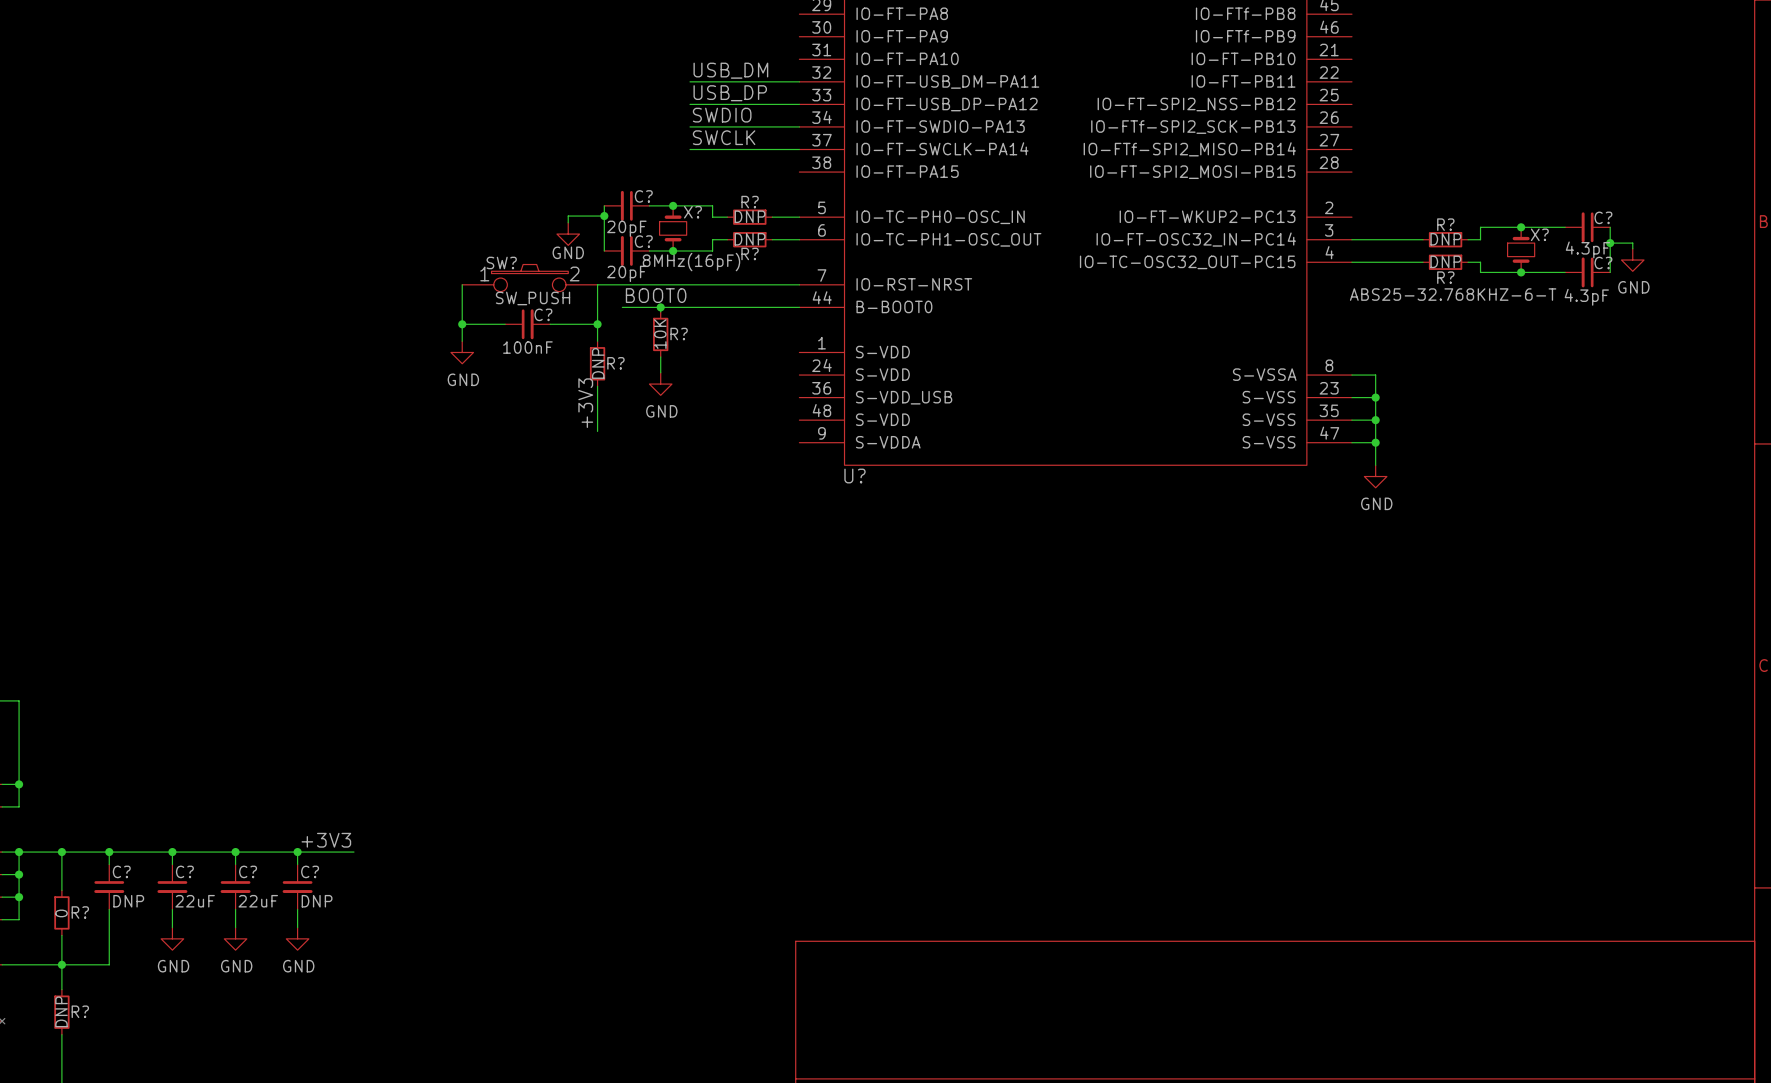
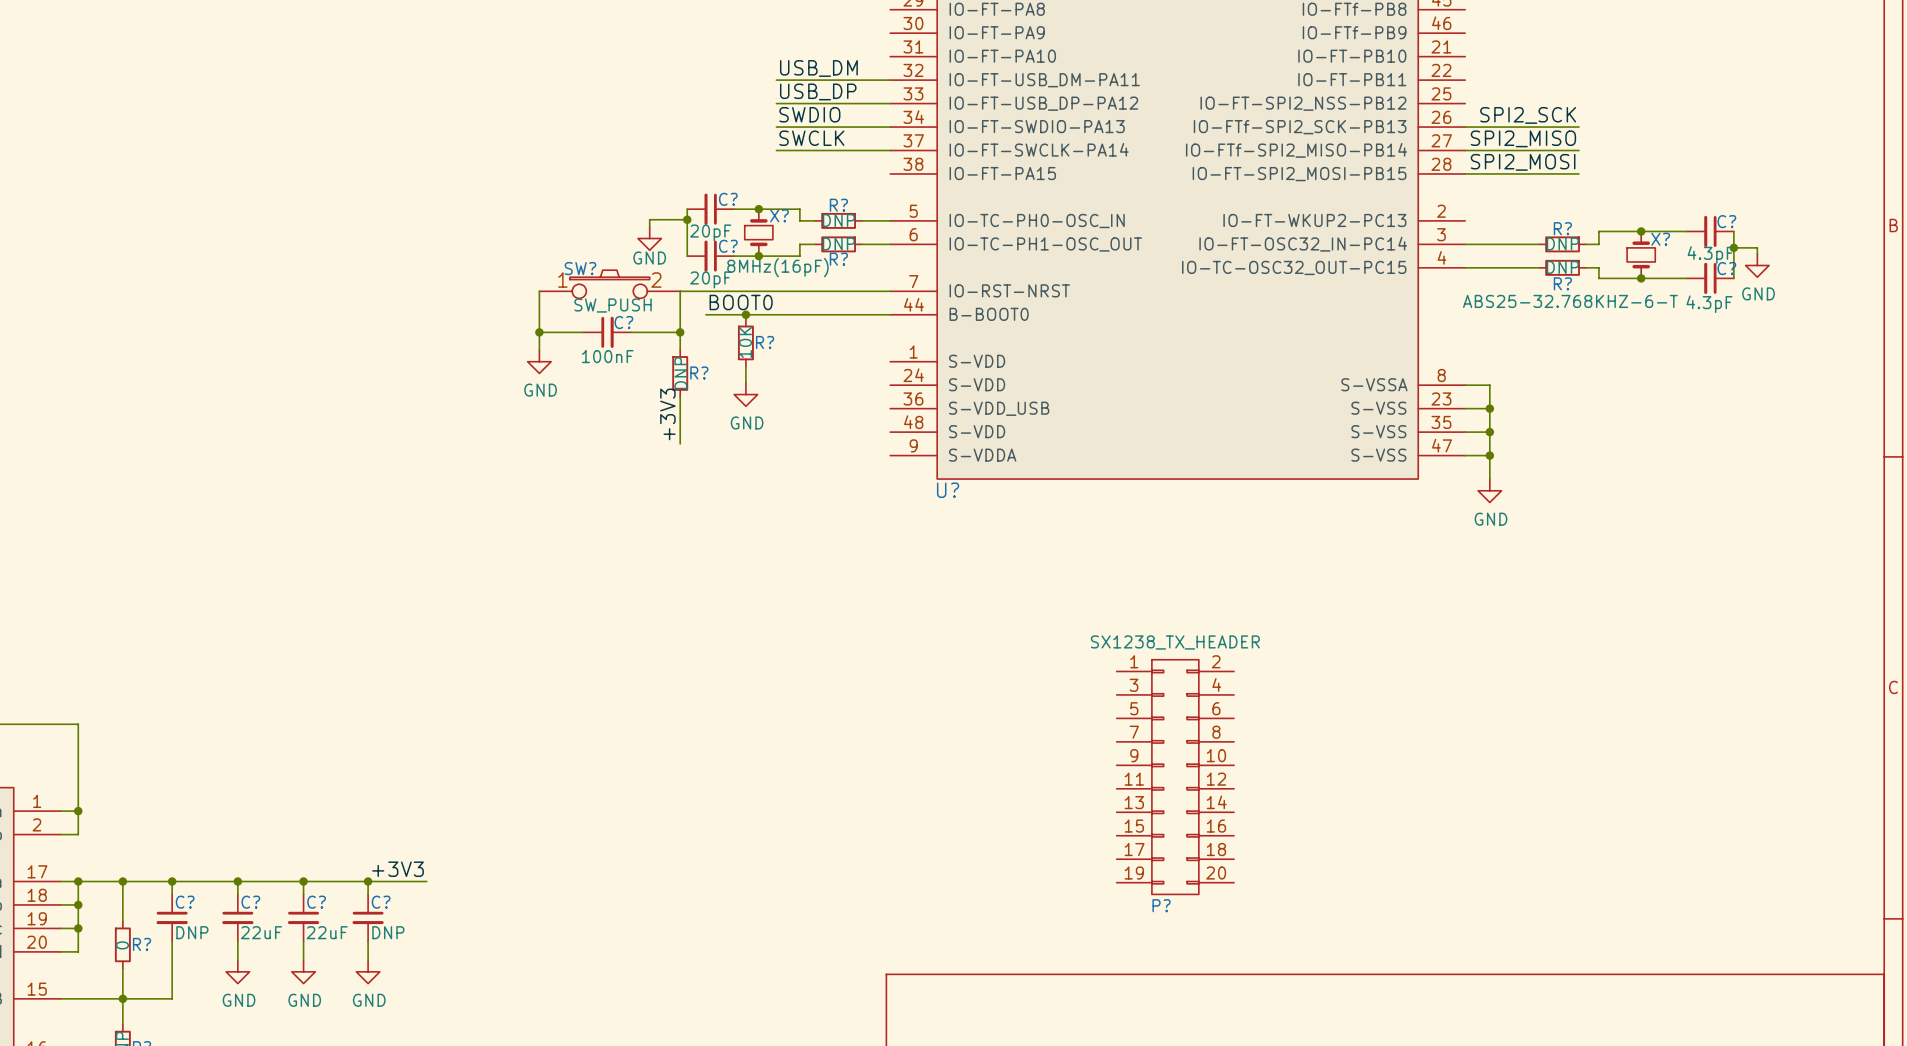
label: none -> SPI2_SCK (1528, 115)
wire: none -> (1465, 127) (1579, 127)
label: none -> SPI2_MISO (1523, 138)
wire: none -> (1465, 150) (1579, 150)
label: none -> SPI2_MOSI (1523, 162)
wire: none -> (1465, 173) (1579, 173)
P?: none -> SX1238_TX_HEADER (1175, 777)

